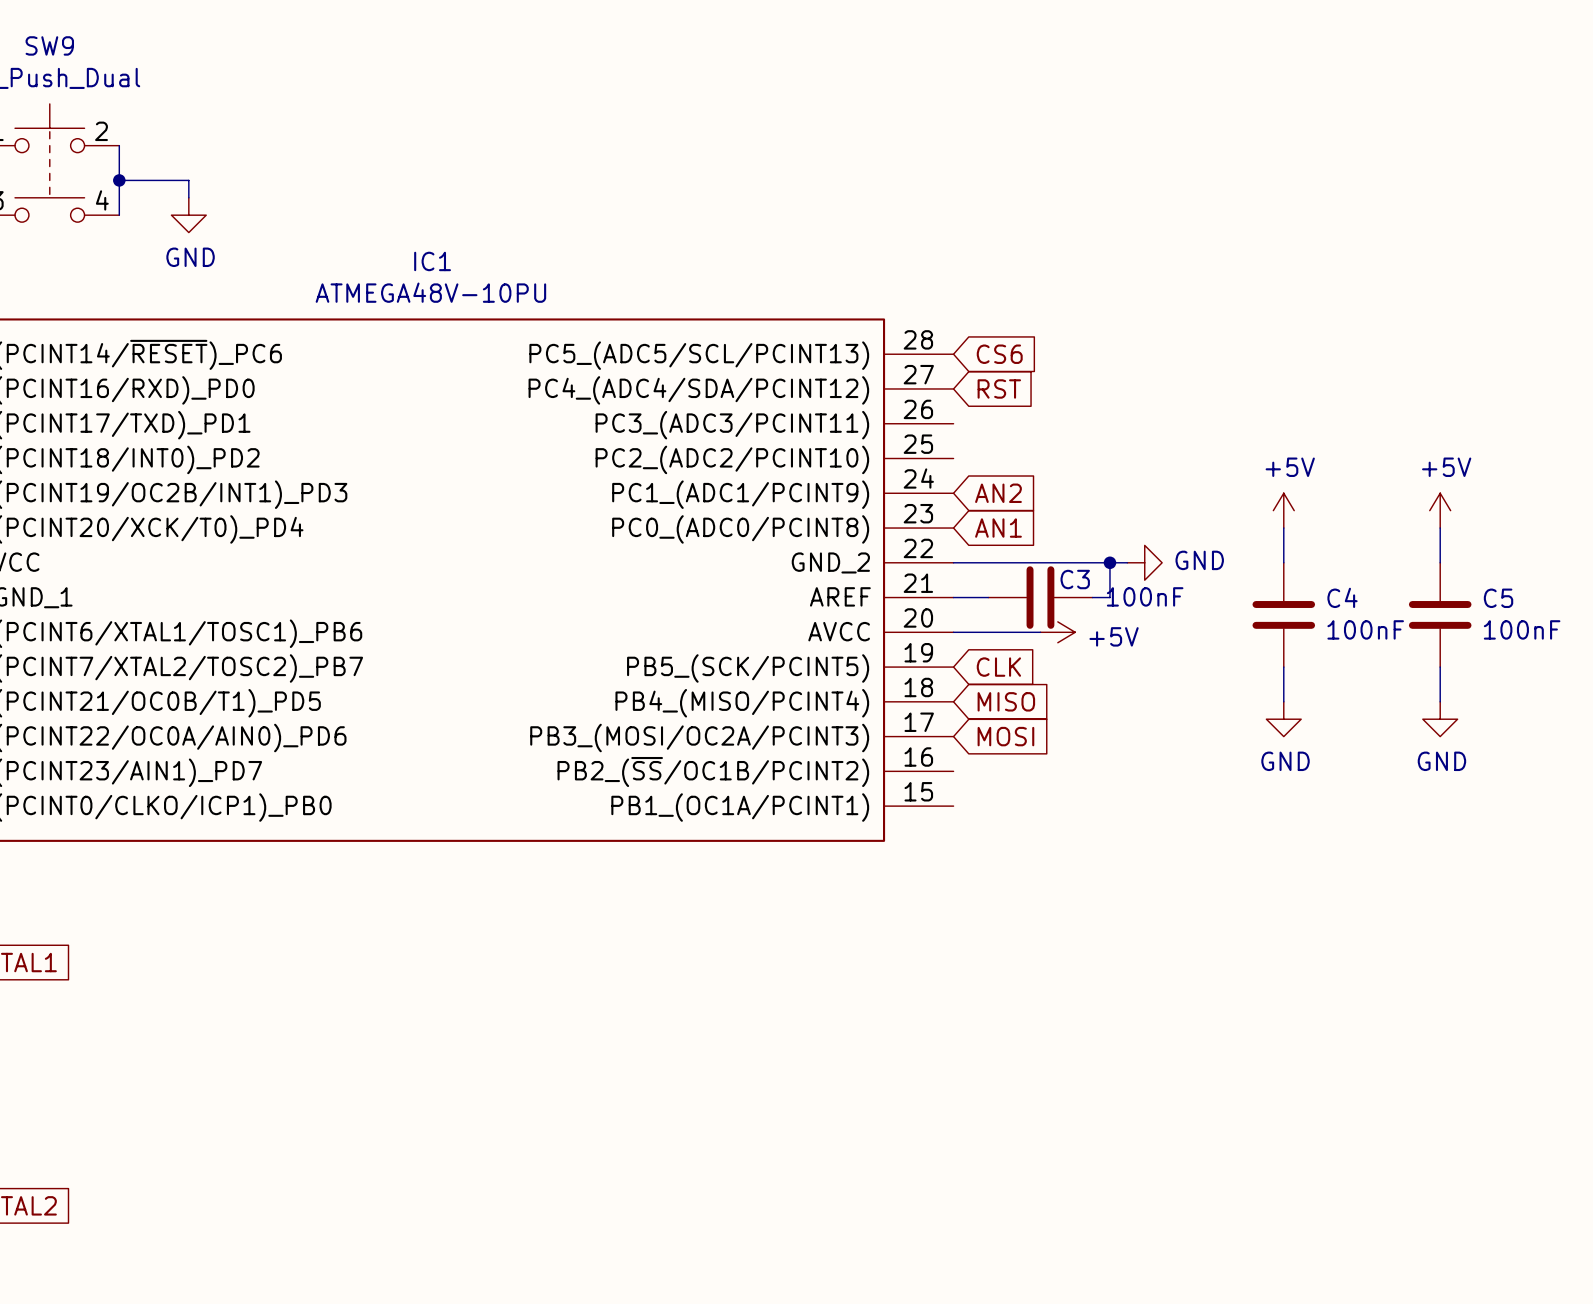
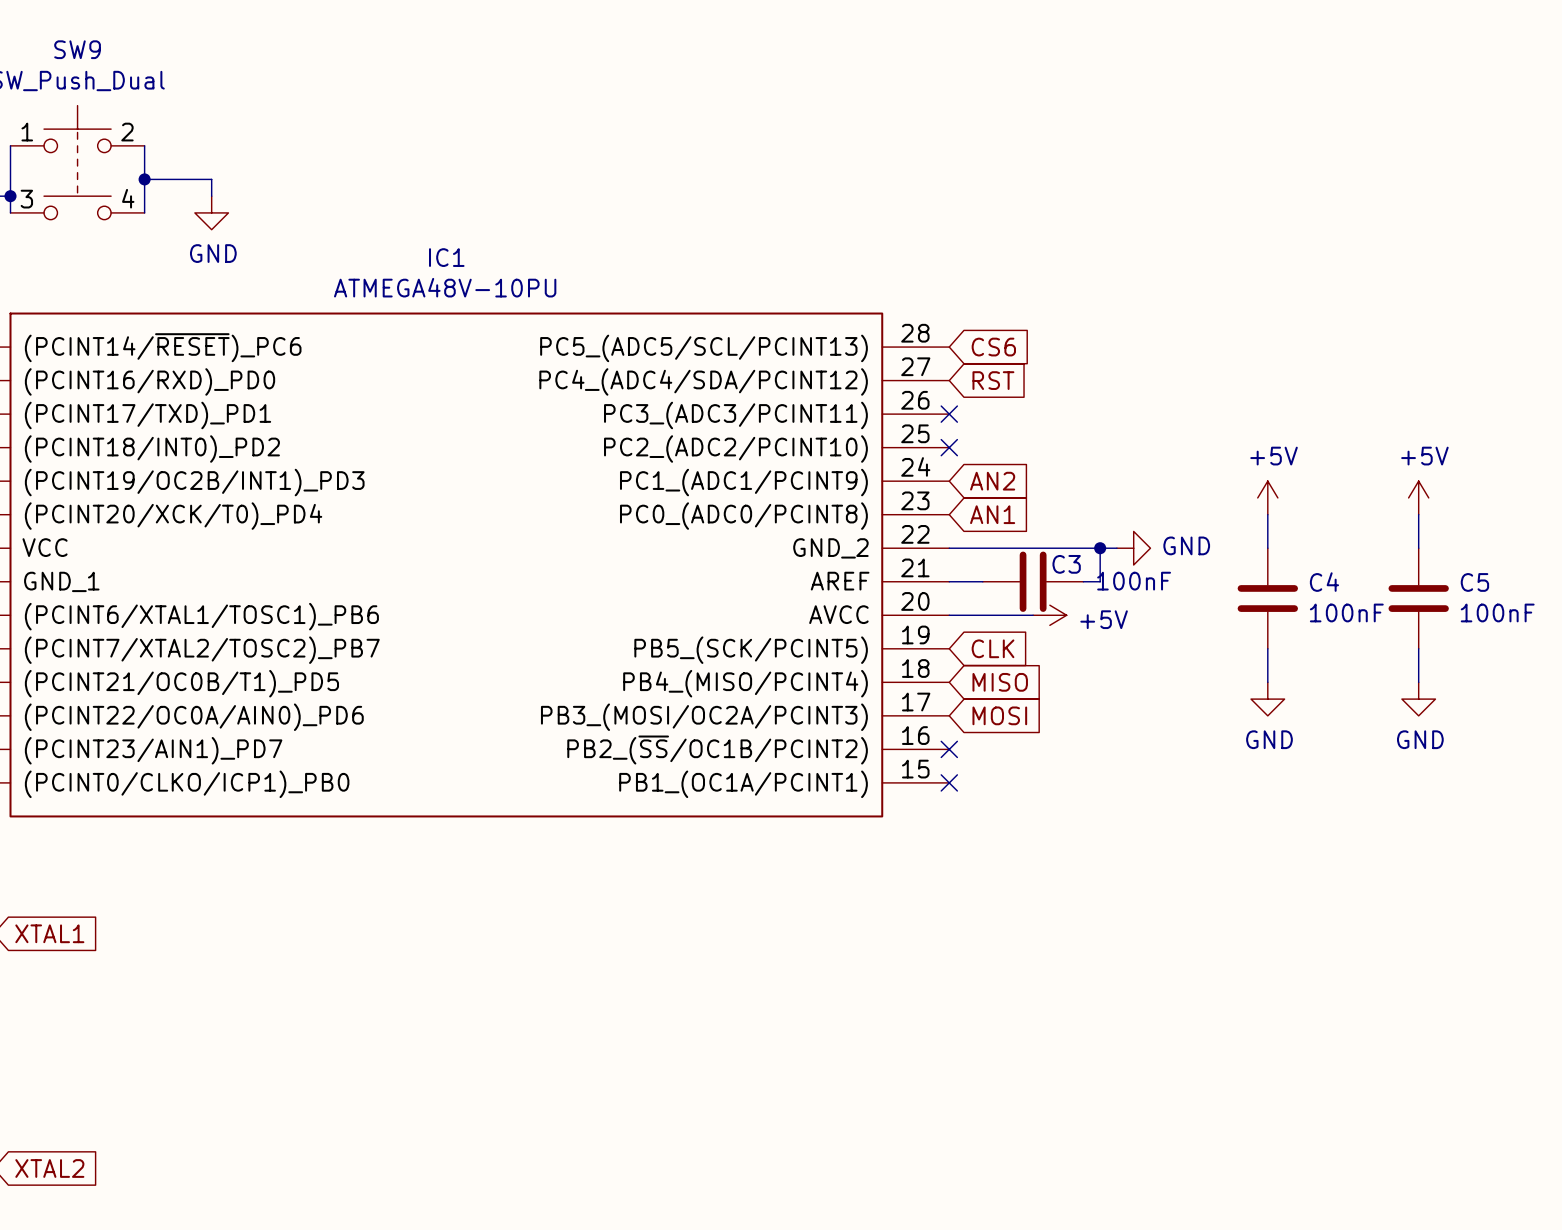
no-connect mark: none -> (949, 414)
no-connect mark: none -> (949, 447)
no-connect mark: none -> (949, 749)
no-connect mark: none -> (949, 782)

